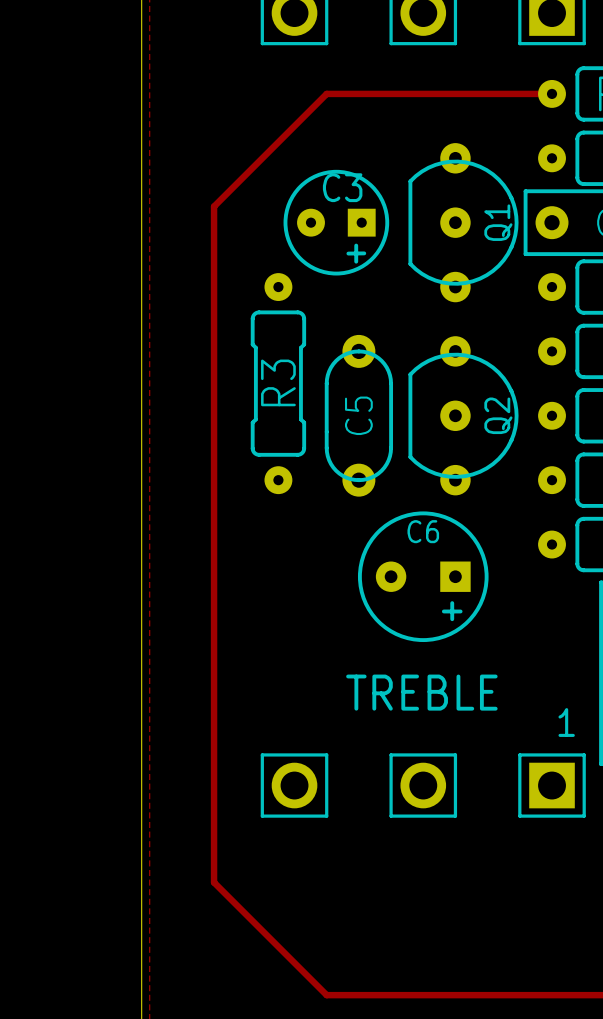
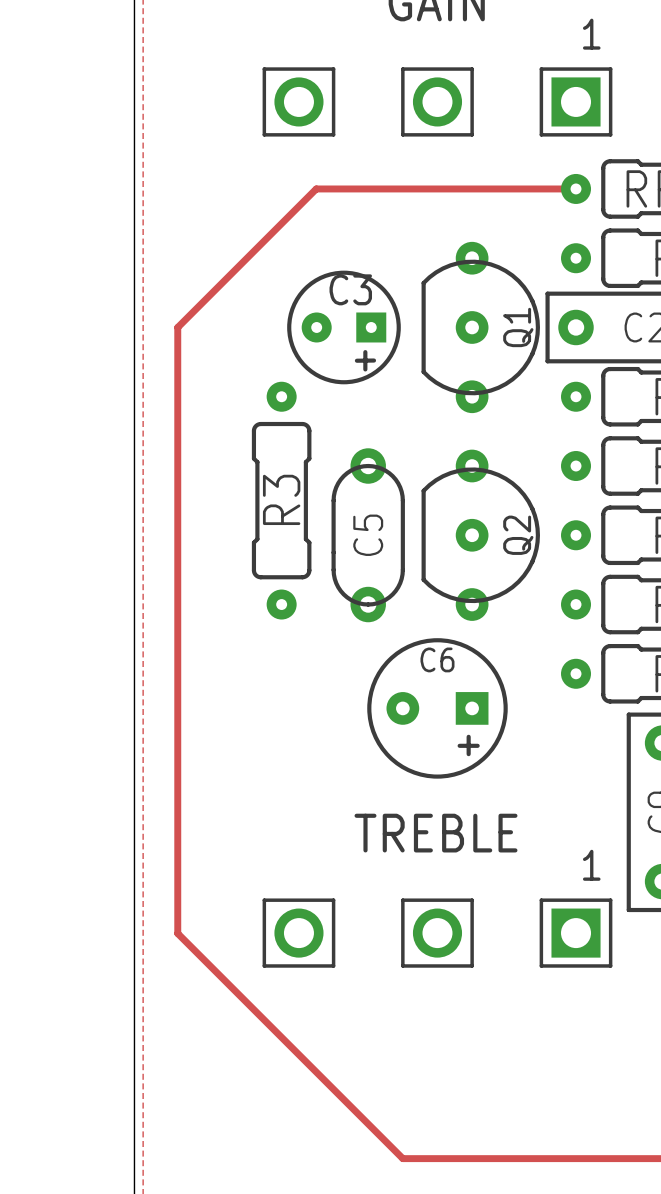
track: (326, 93) (214, 206) (214, 882) (326, 995) (391, 995) -> (333, 188) (316, 188) (177, 327) (177, 933) (402, 1158)

